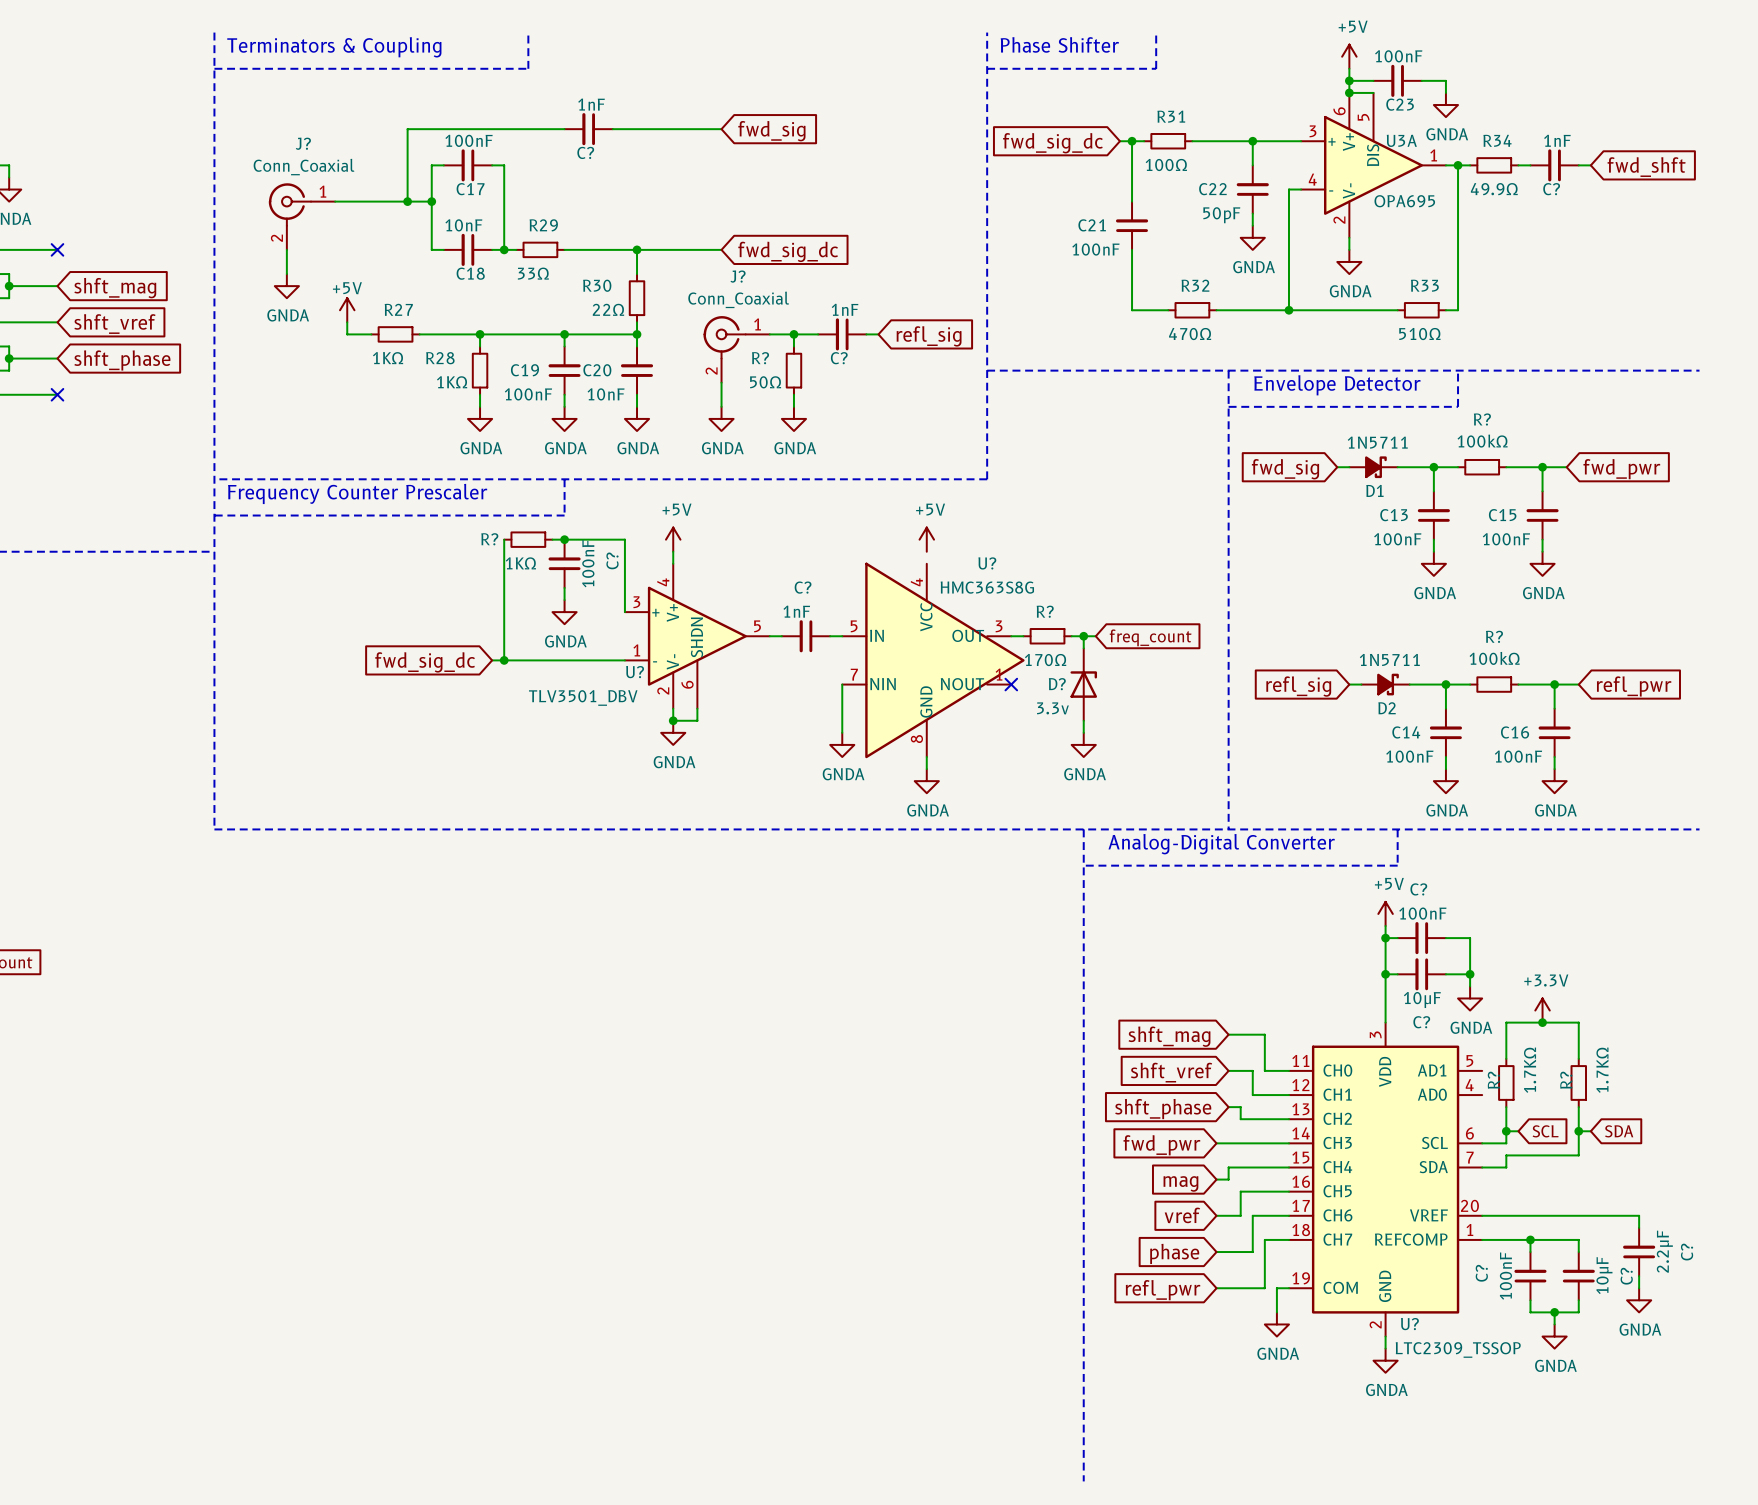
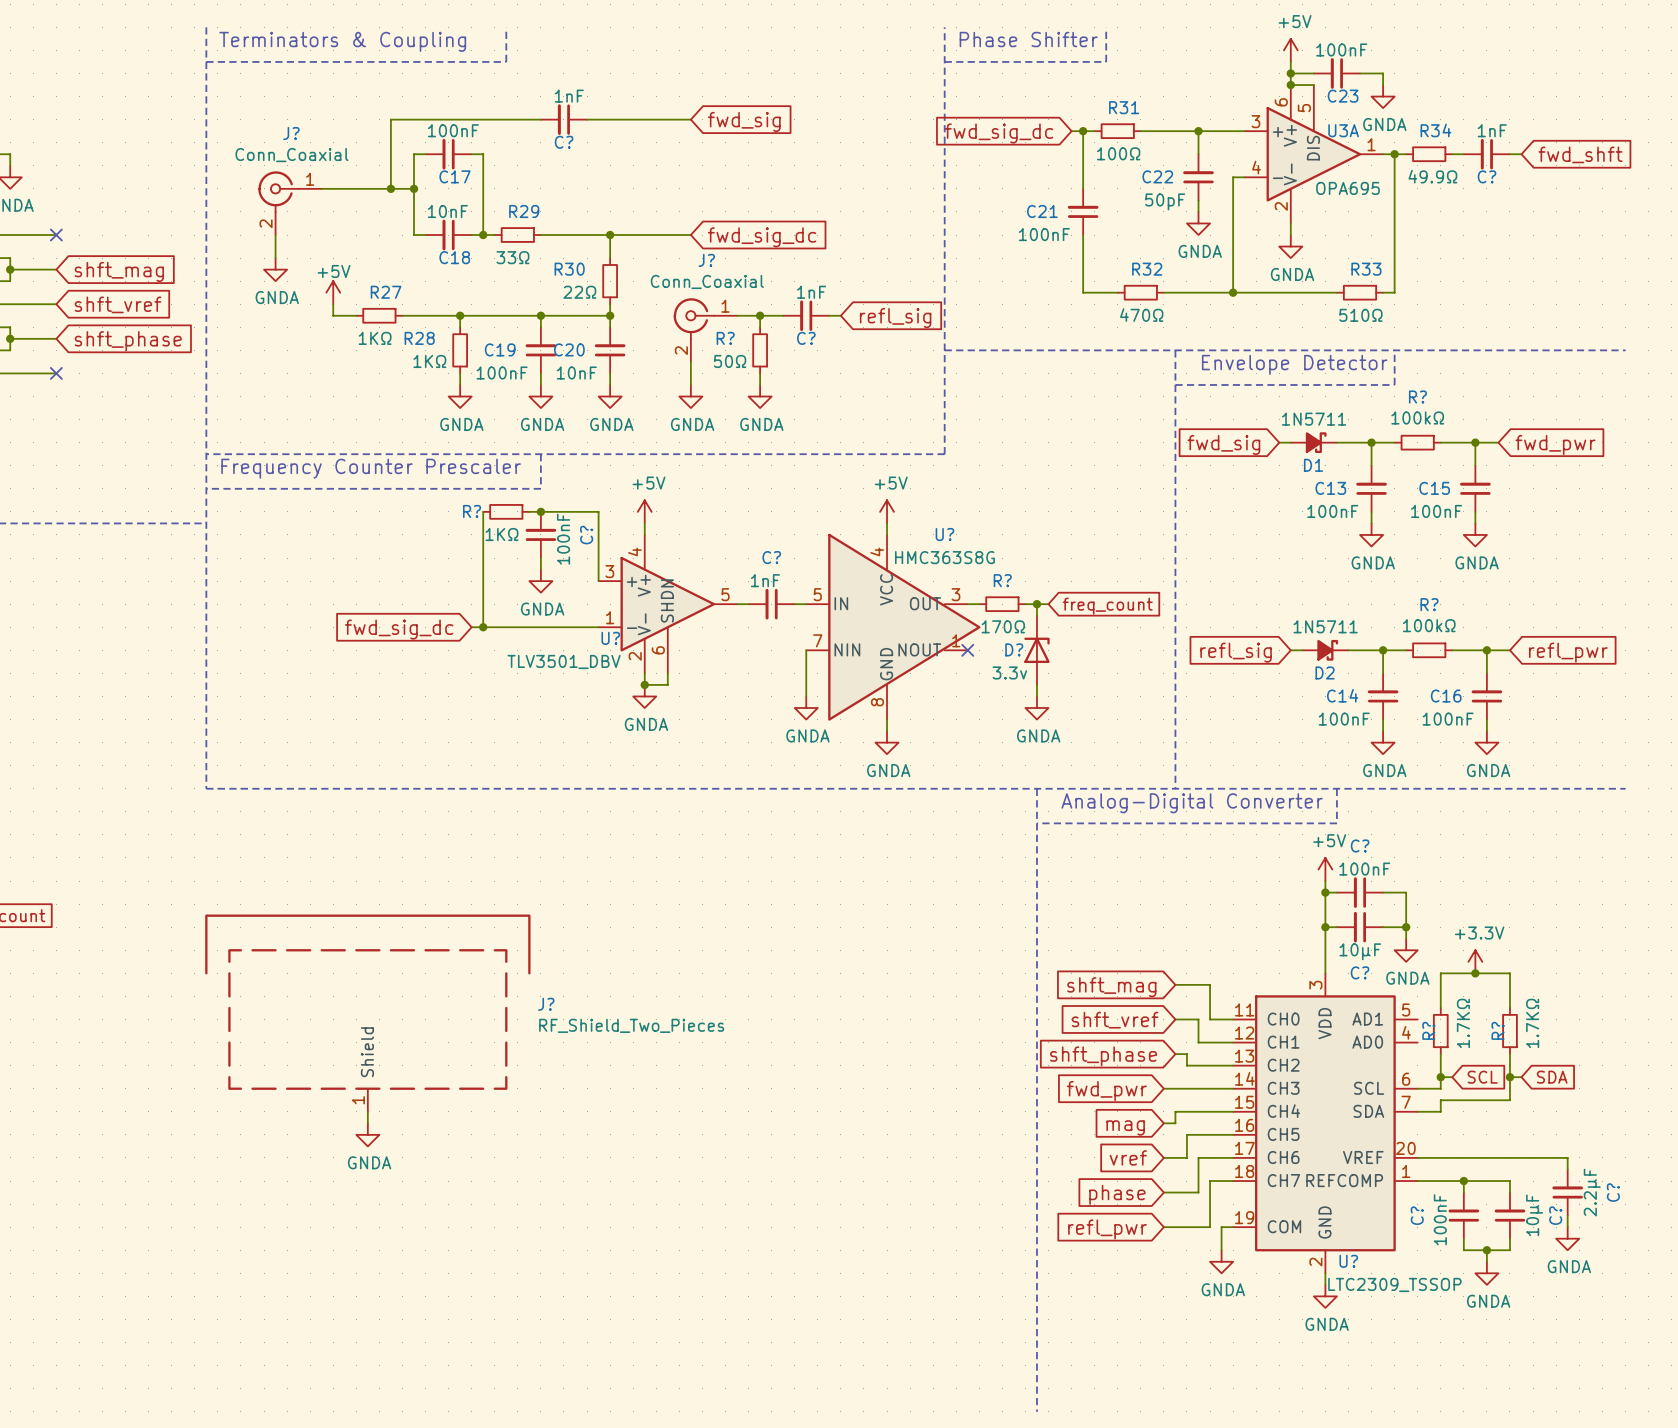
wire: none -> (887, 523) (887, 534)
J?: none -> RF_Shield_Two_Pieces (367, 1013)
wire: none -> (367, 1111) (367, 1123)
power symbol: none -> GNDA (367, 1134)

